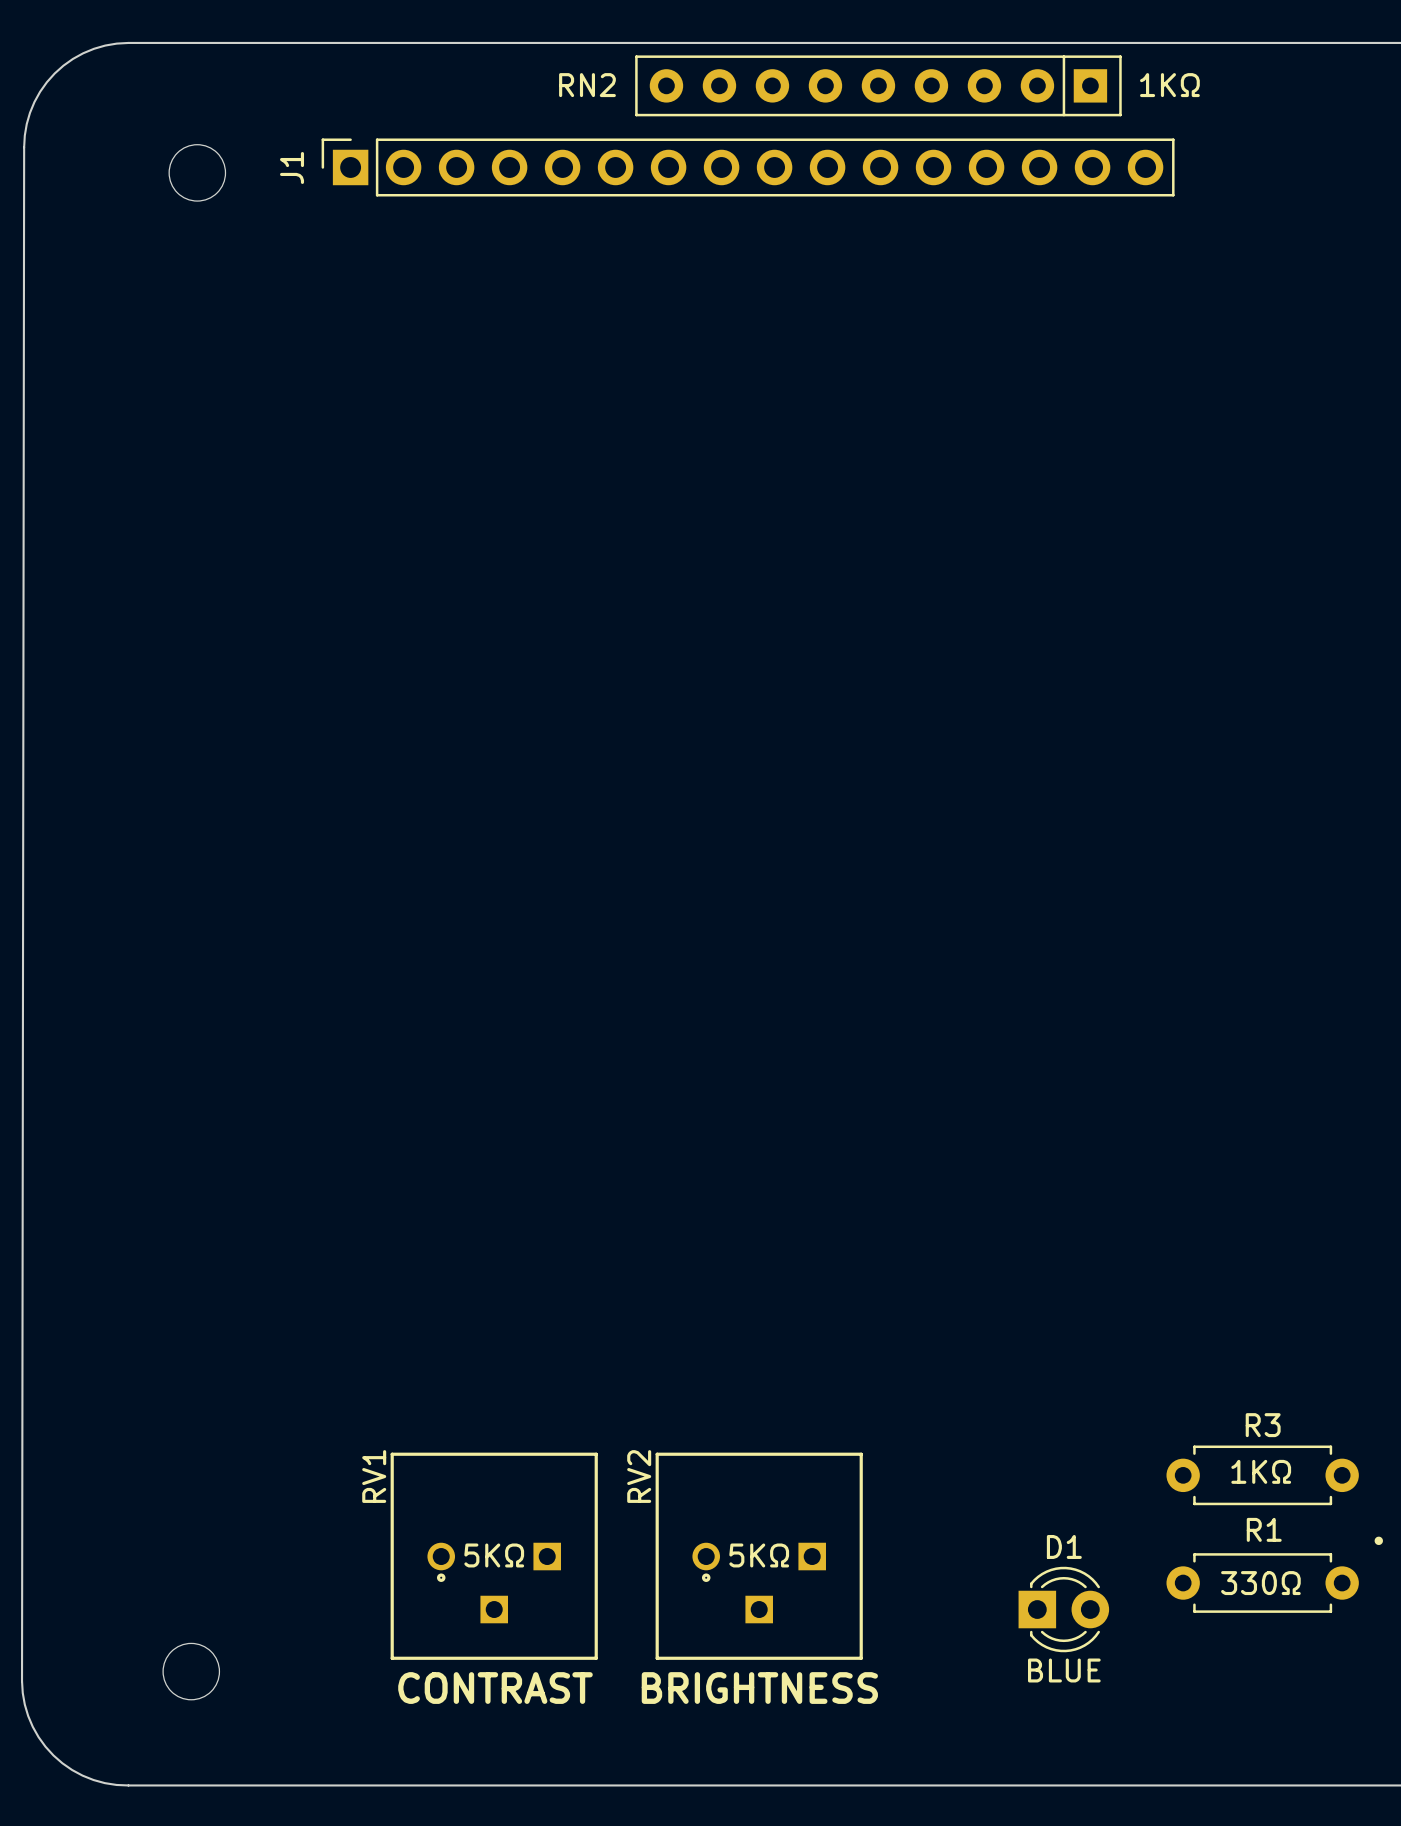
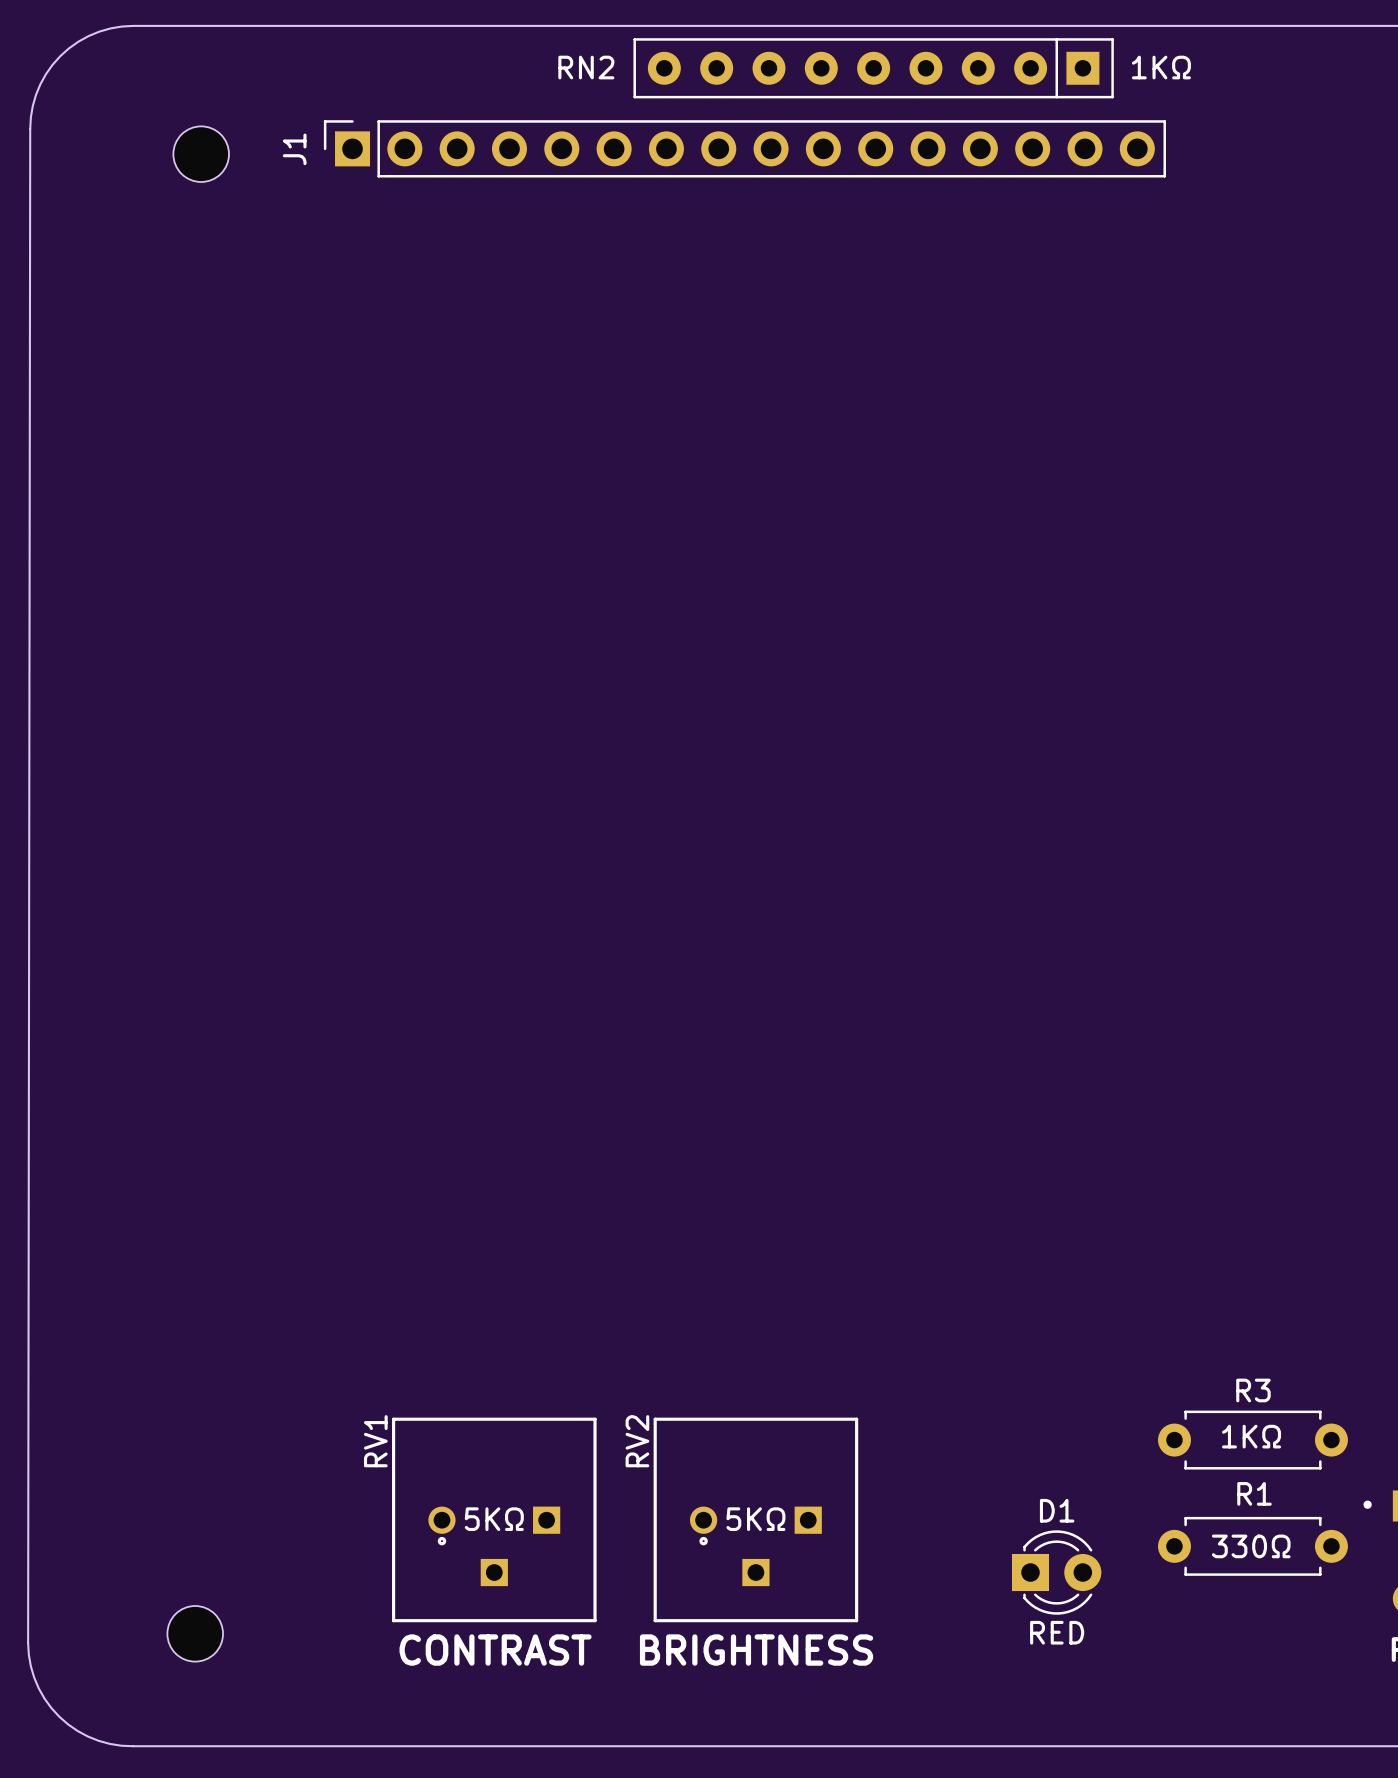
D1 value: BLUE (1064, 1670) -> RED (1057, 1632)

